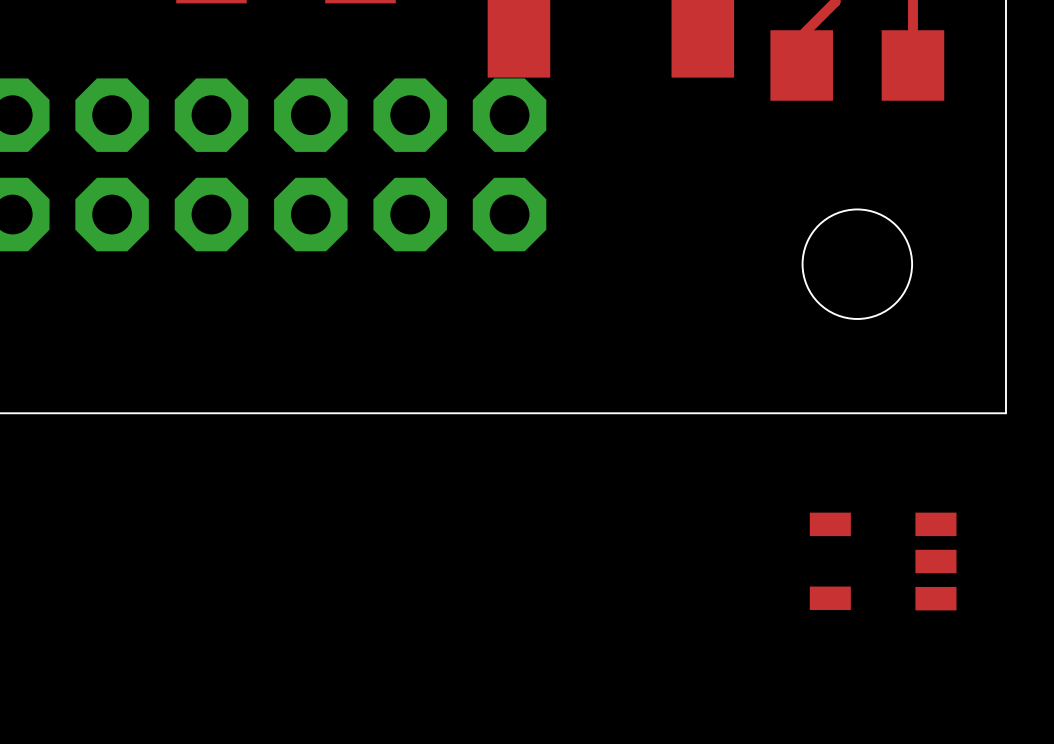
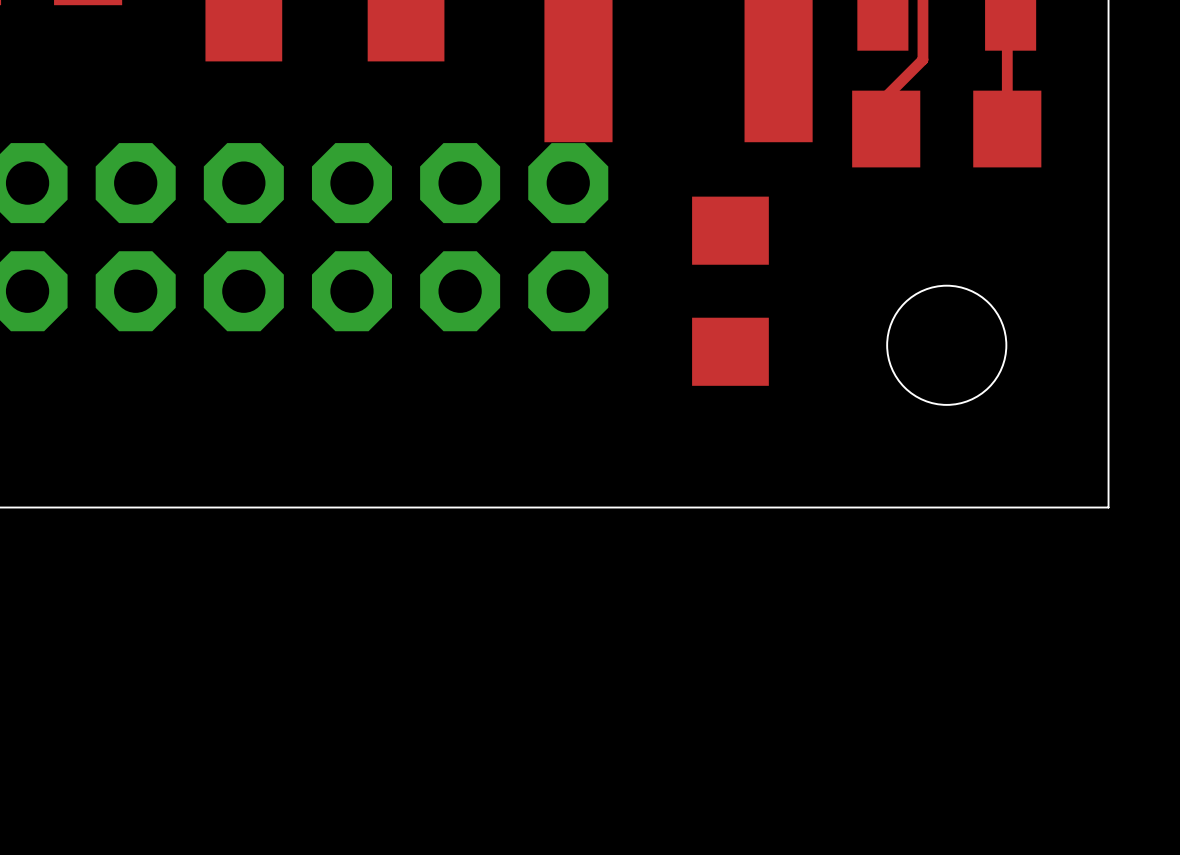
part: none -> (730, 291)
part: (883, 561) -> none

